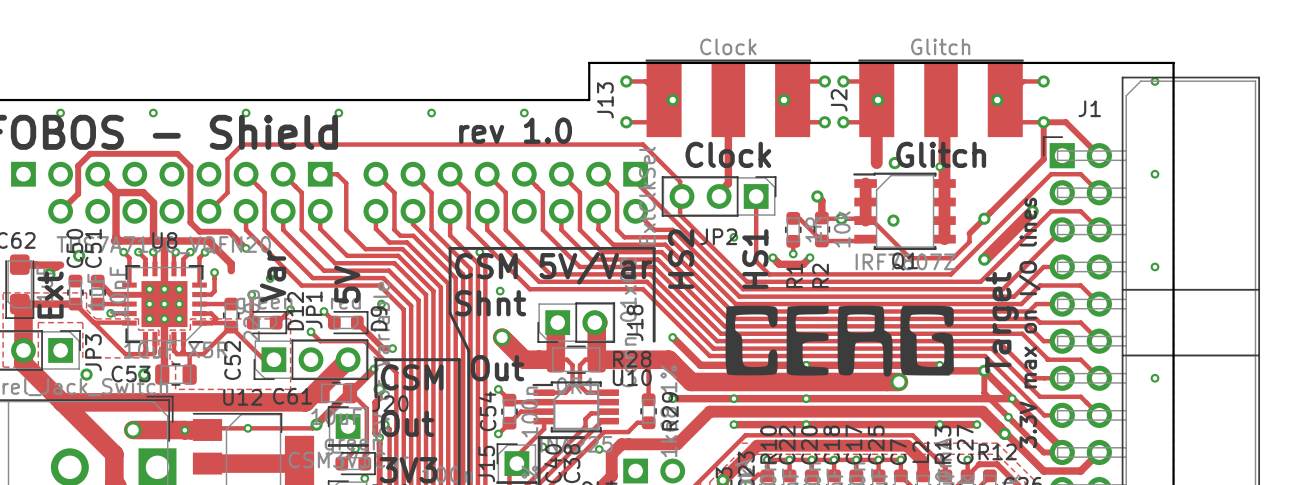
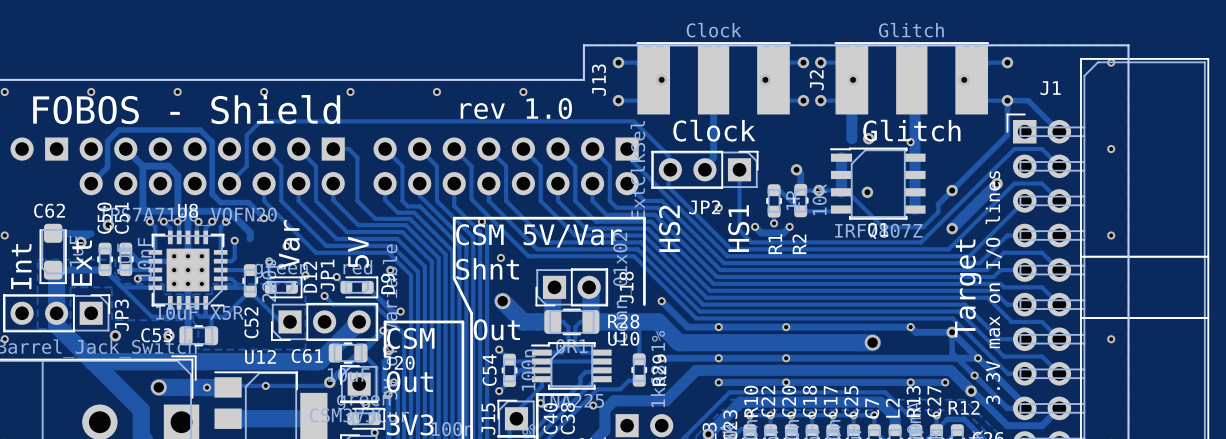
drawing: [725, 305, 954, 377] -> none

